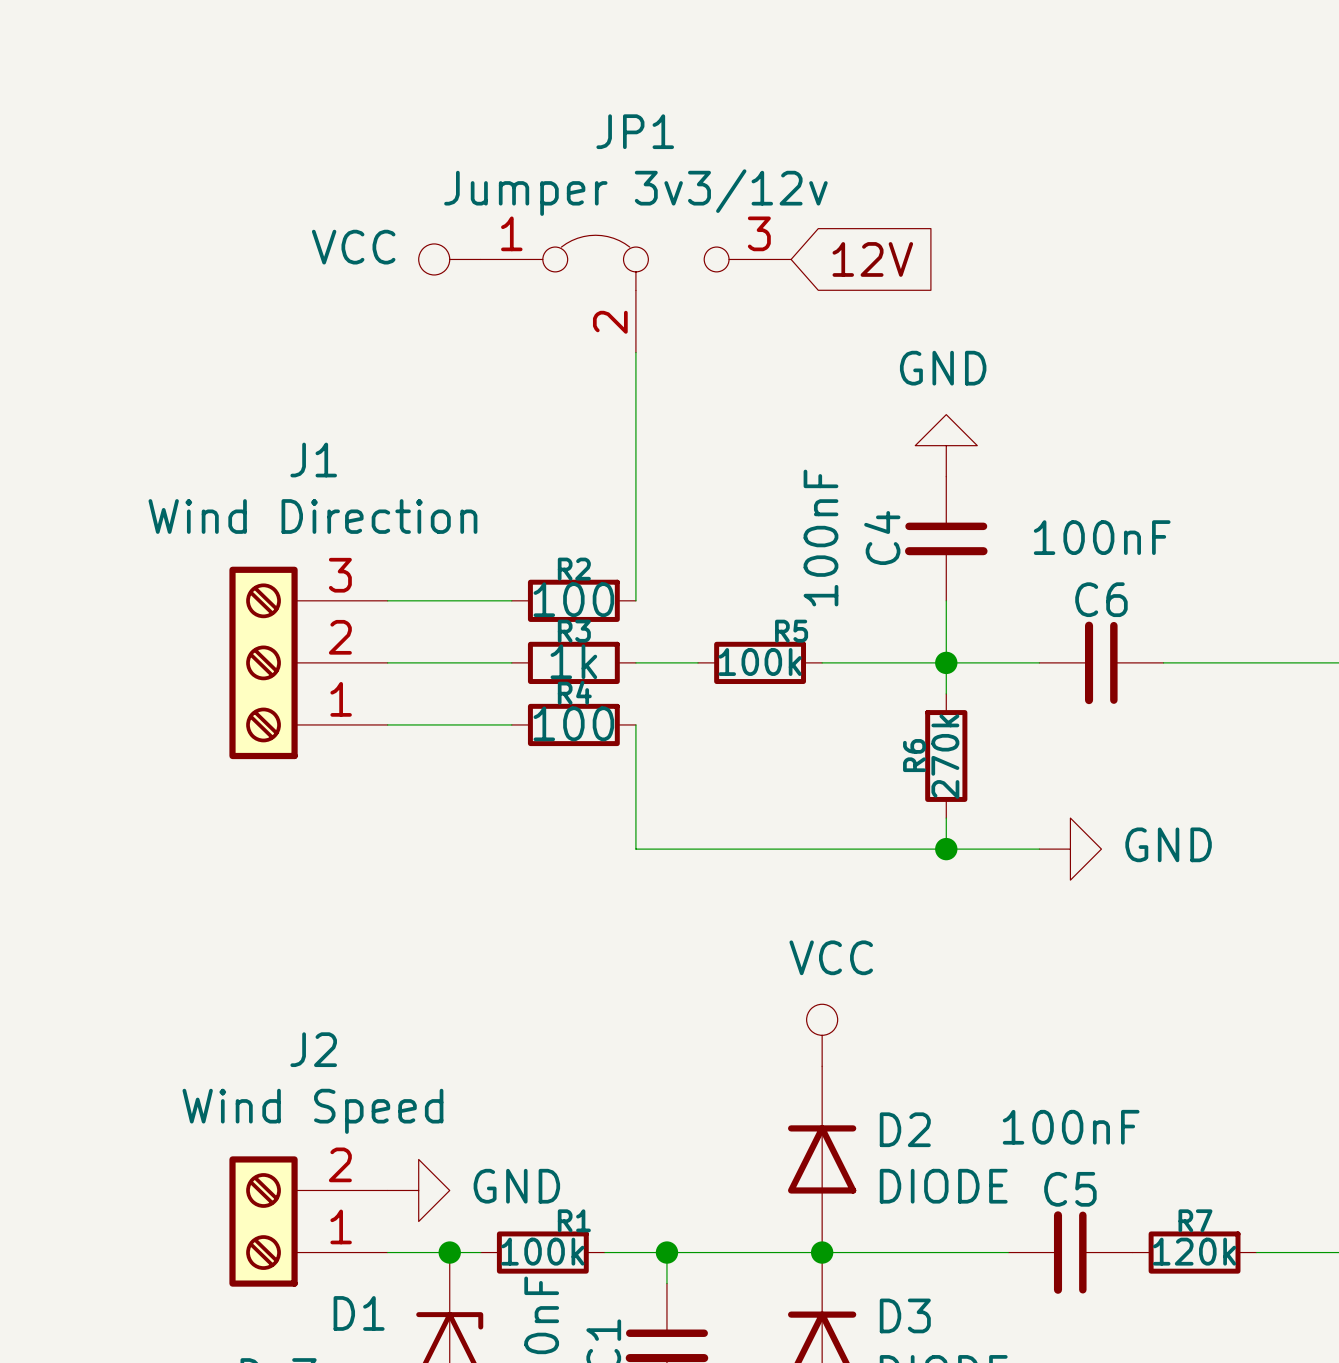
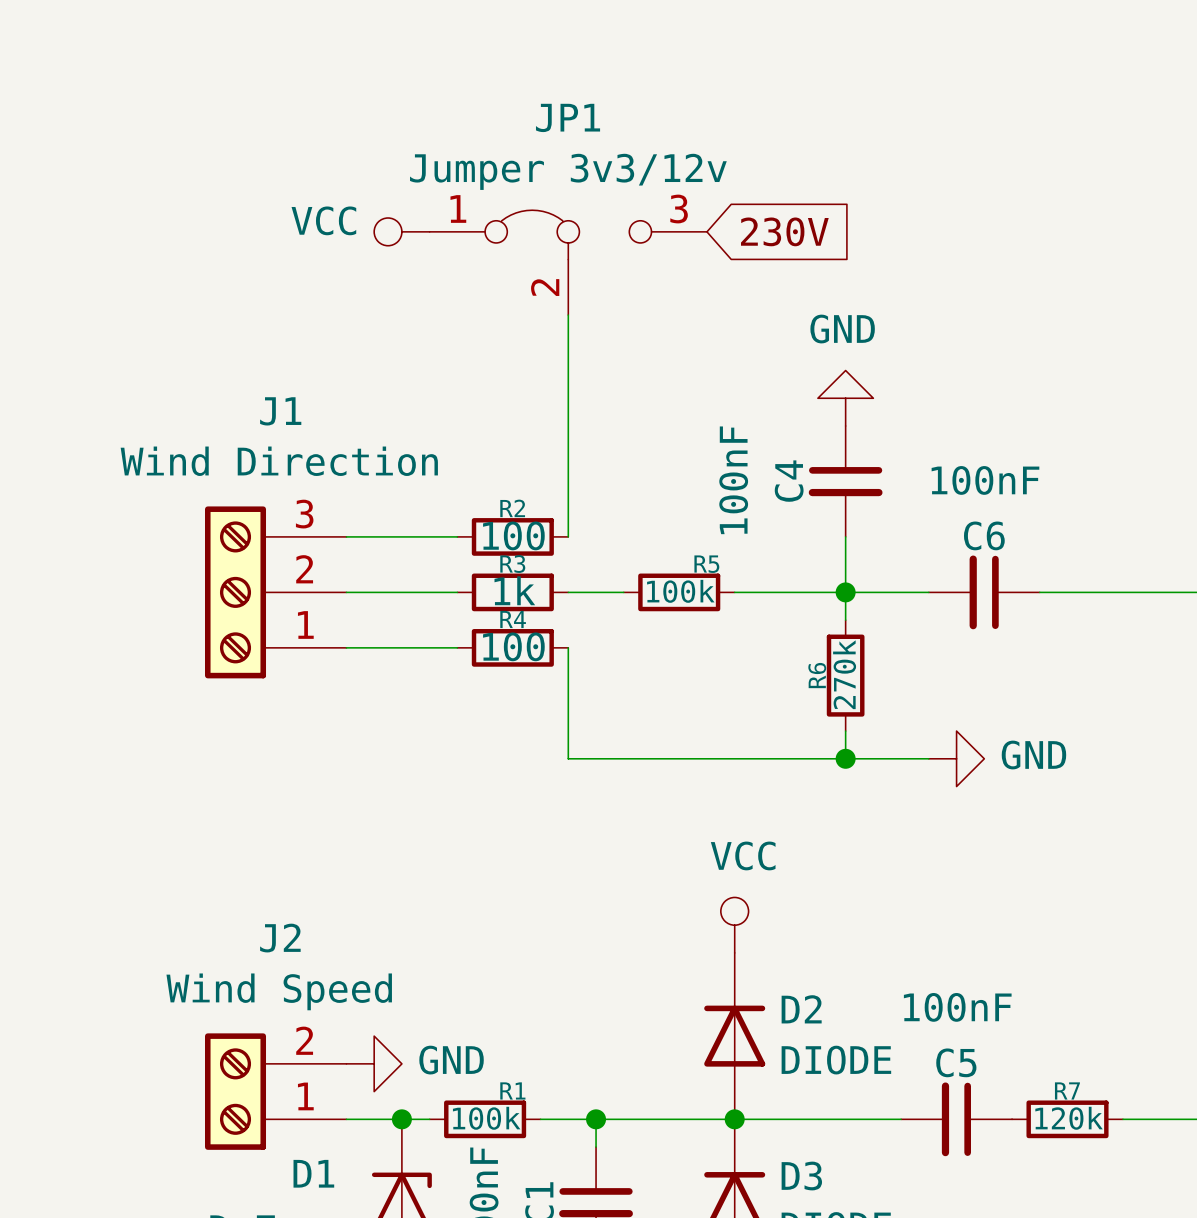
global label: 12V (872, 259) -> 230V (784, 231)

